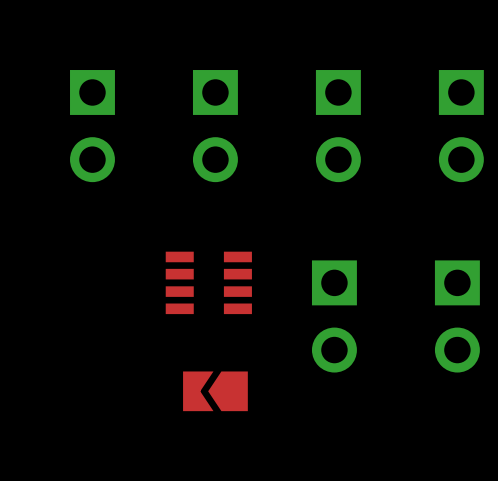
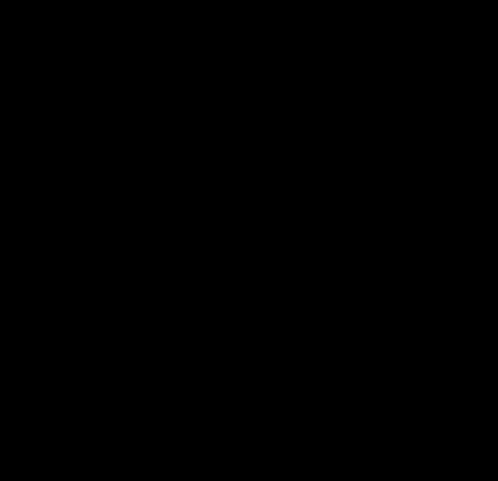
part: (92, 126) -> none
part: (215, 126) -> none
part: (338, 126) -> none
part: (461, 126) -> none
part: (208, 282) -> none
part: (334, 316) -> none
part: (457, 316) -> none
part: (215, 391) -> none

